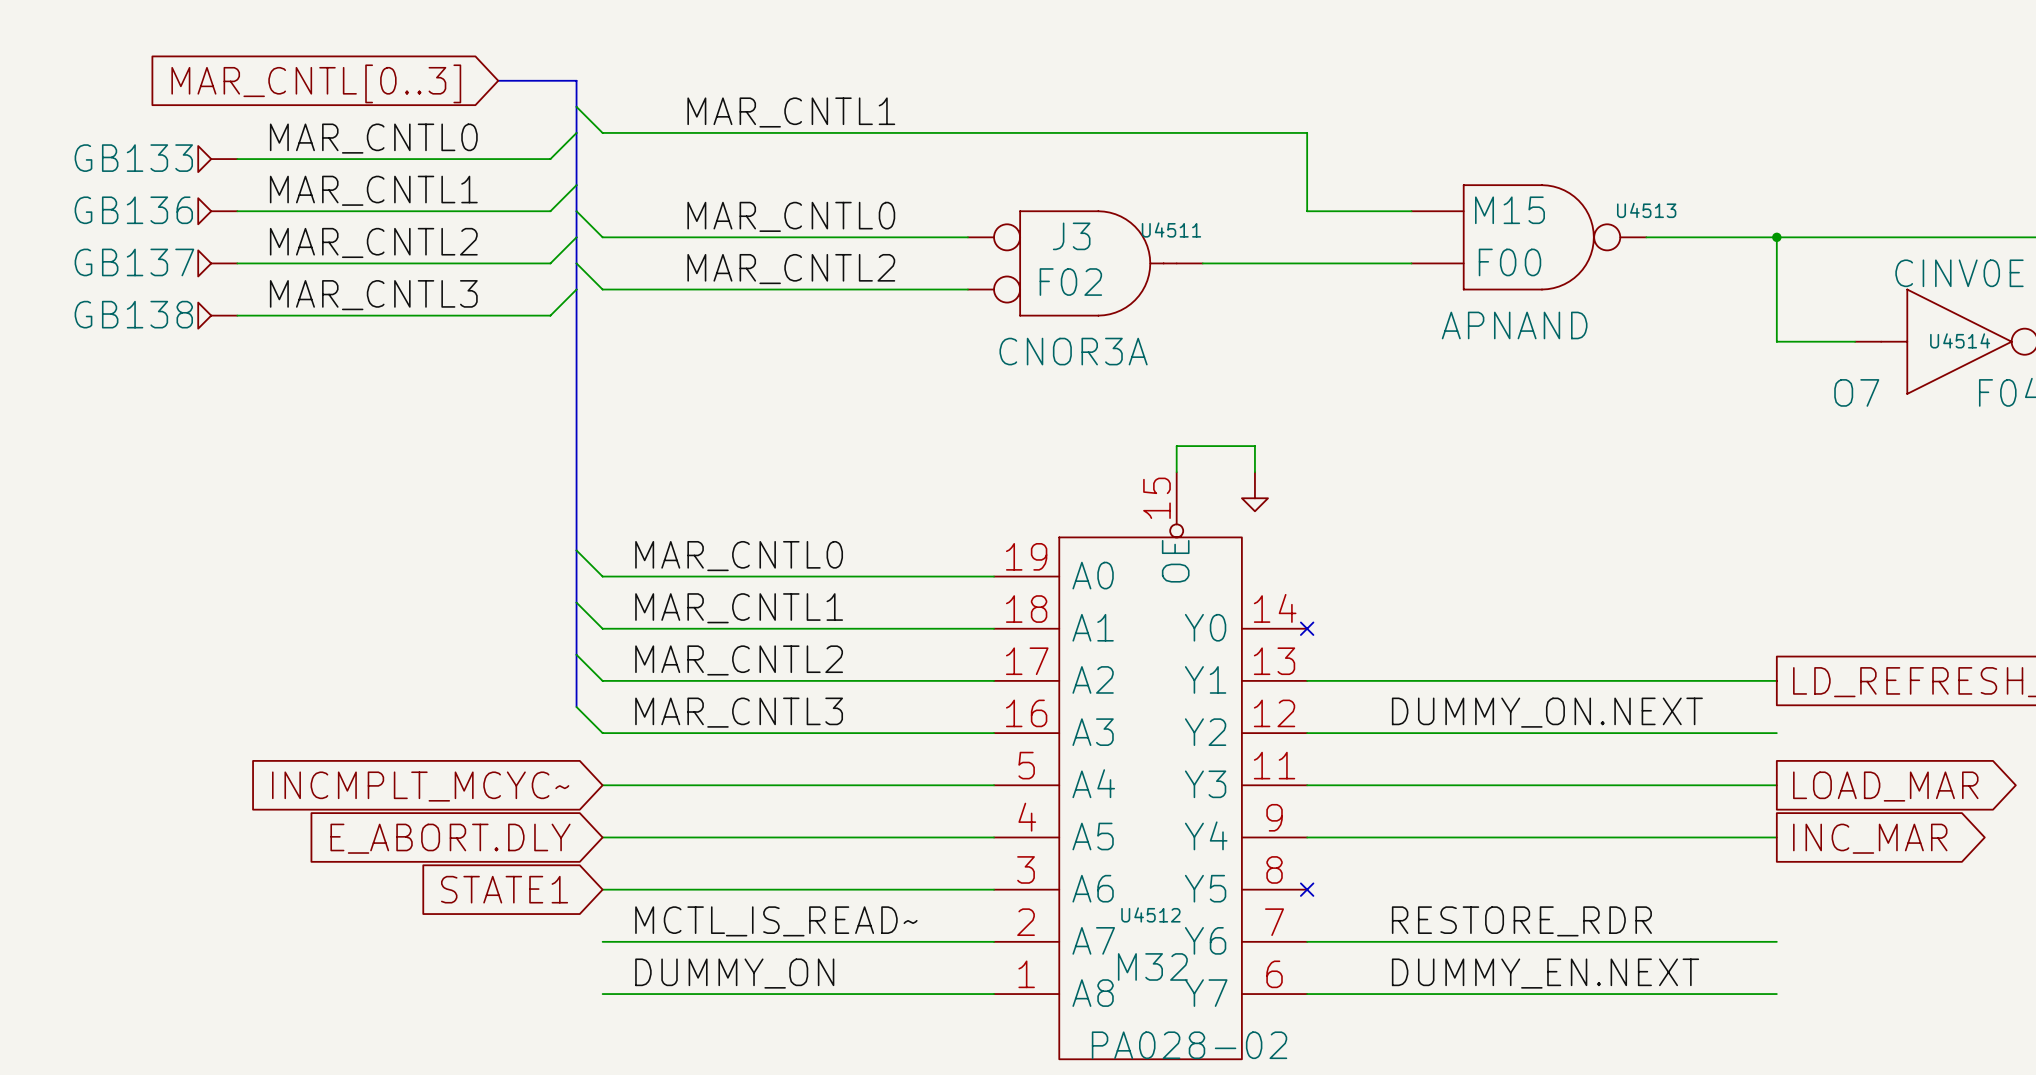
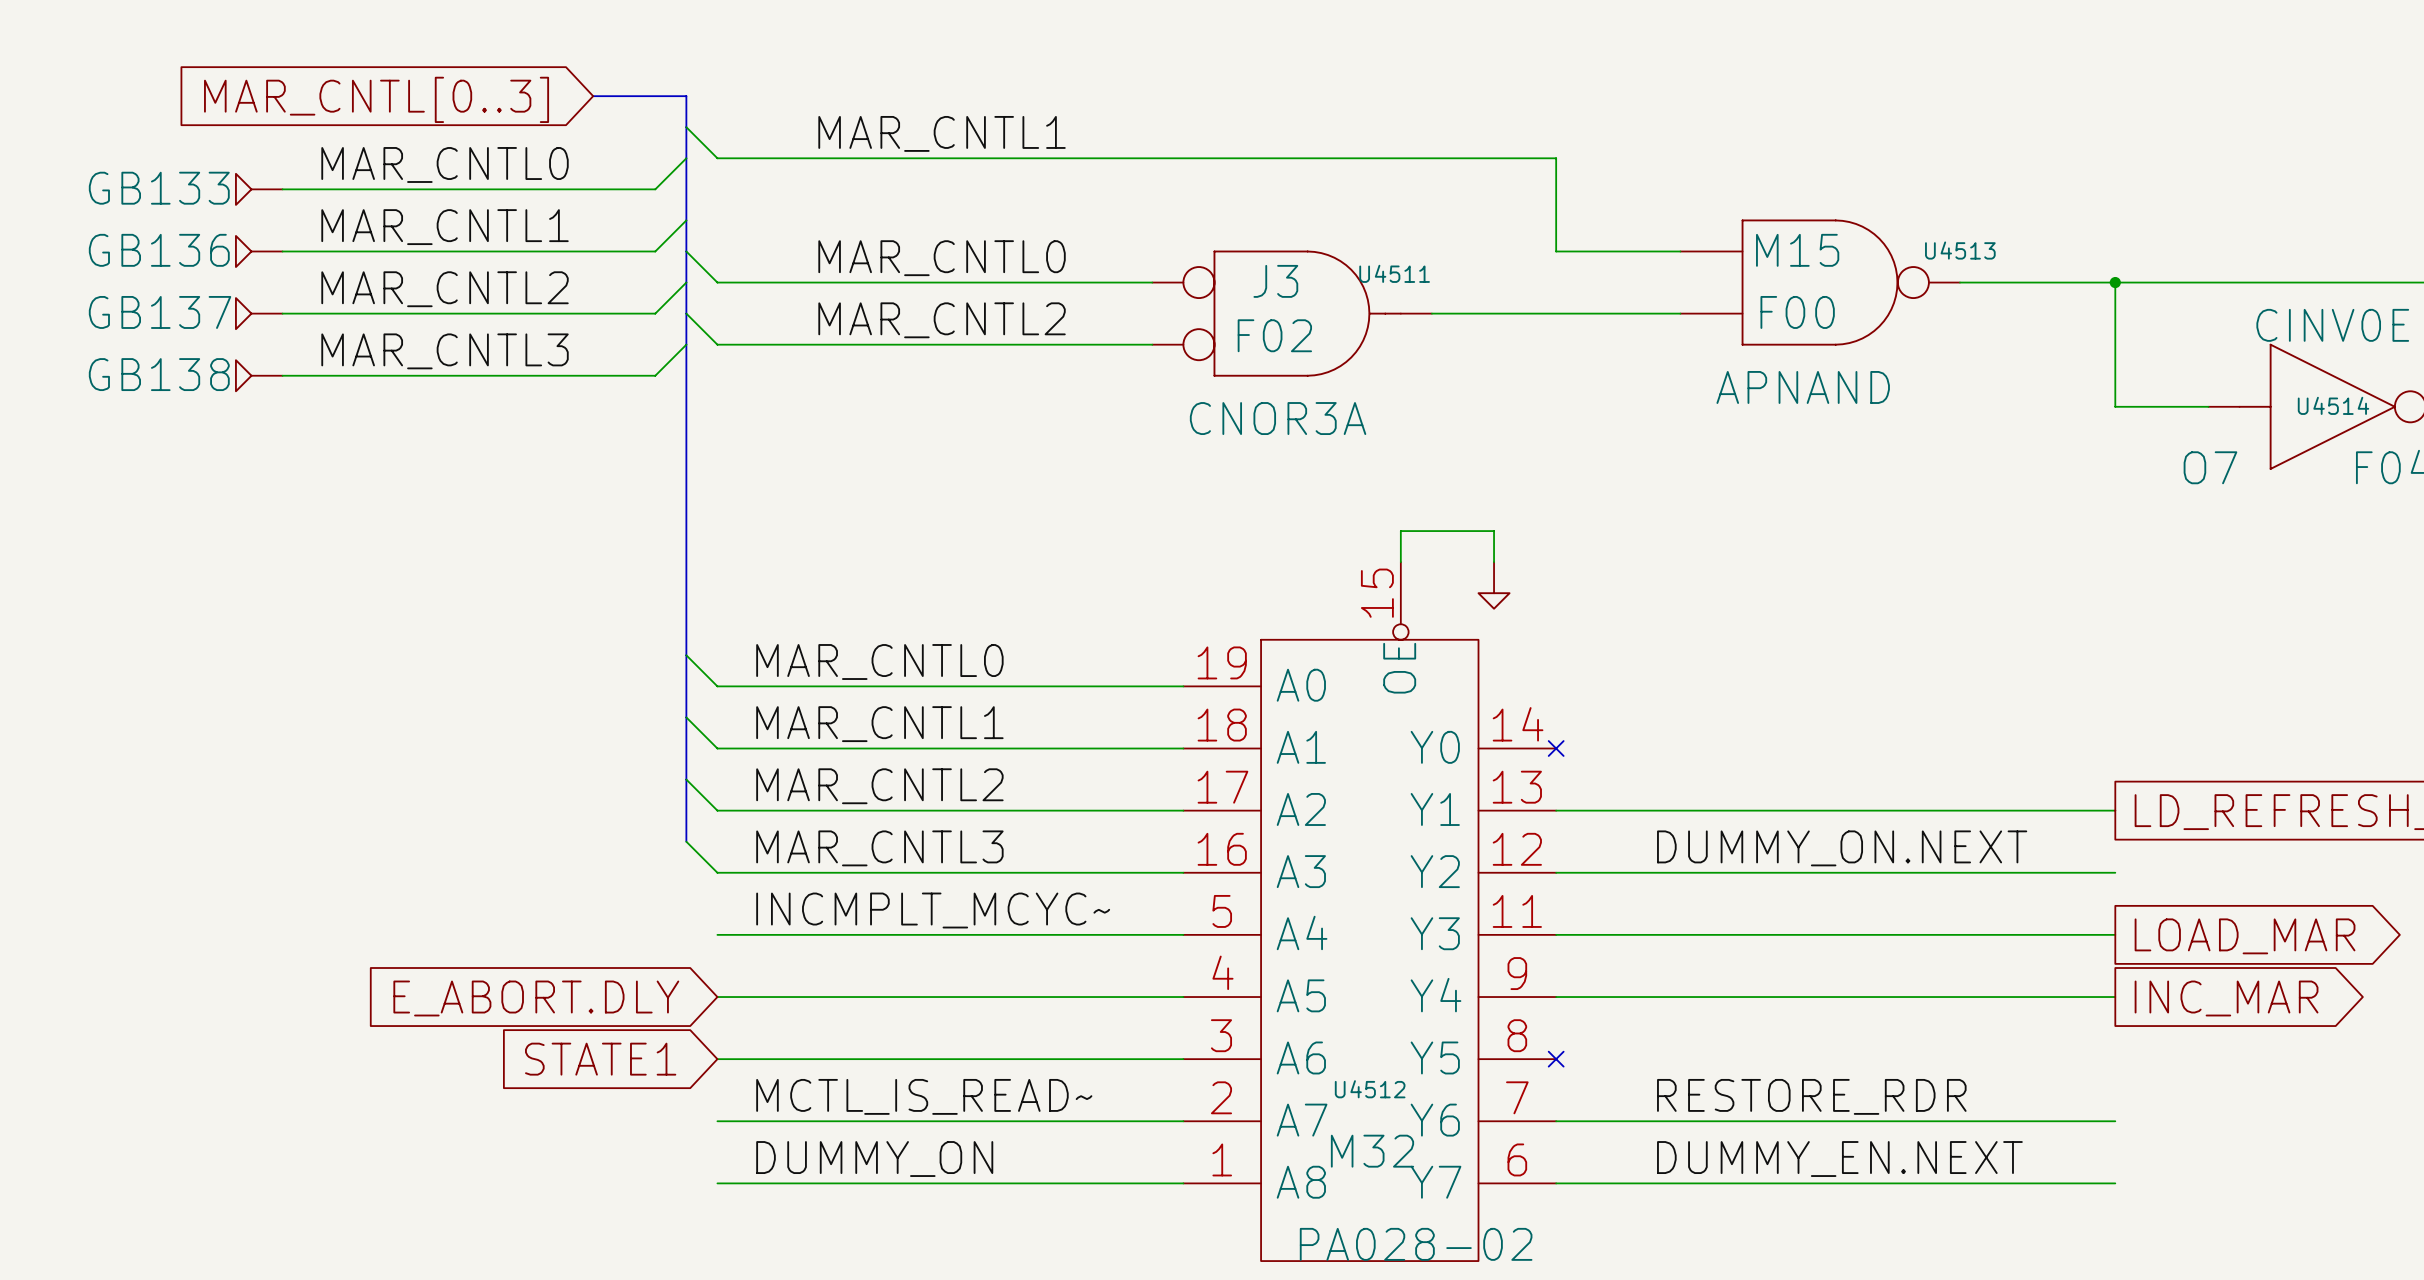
label: none -> INCMPLT_MCYC~ (933, 910)
global label: INCMPLT_MCYC~ (420, 786) -> none

